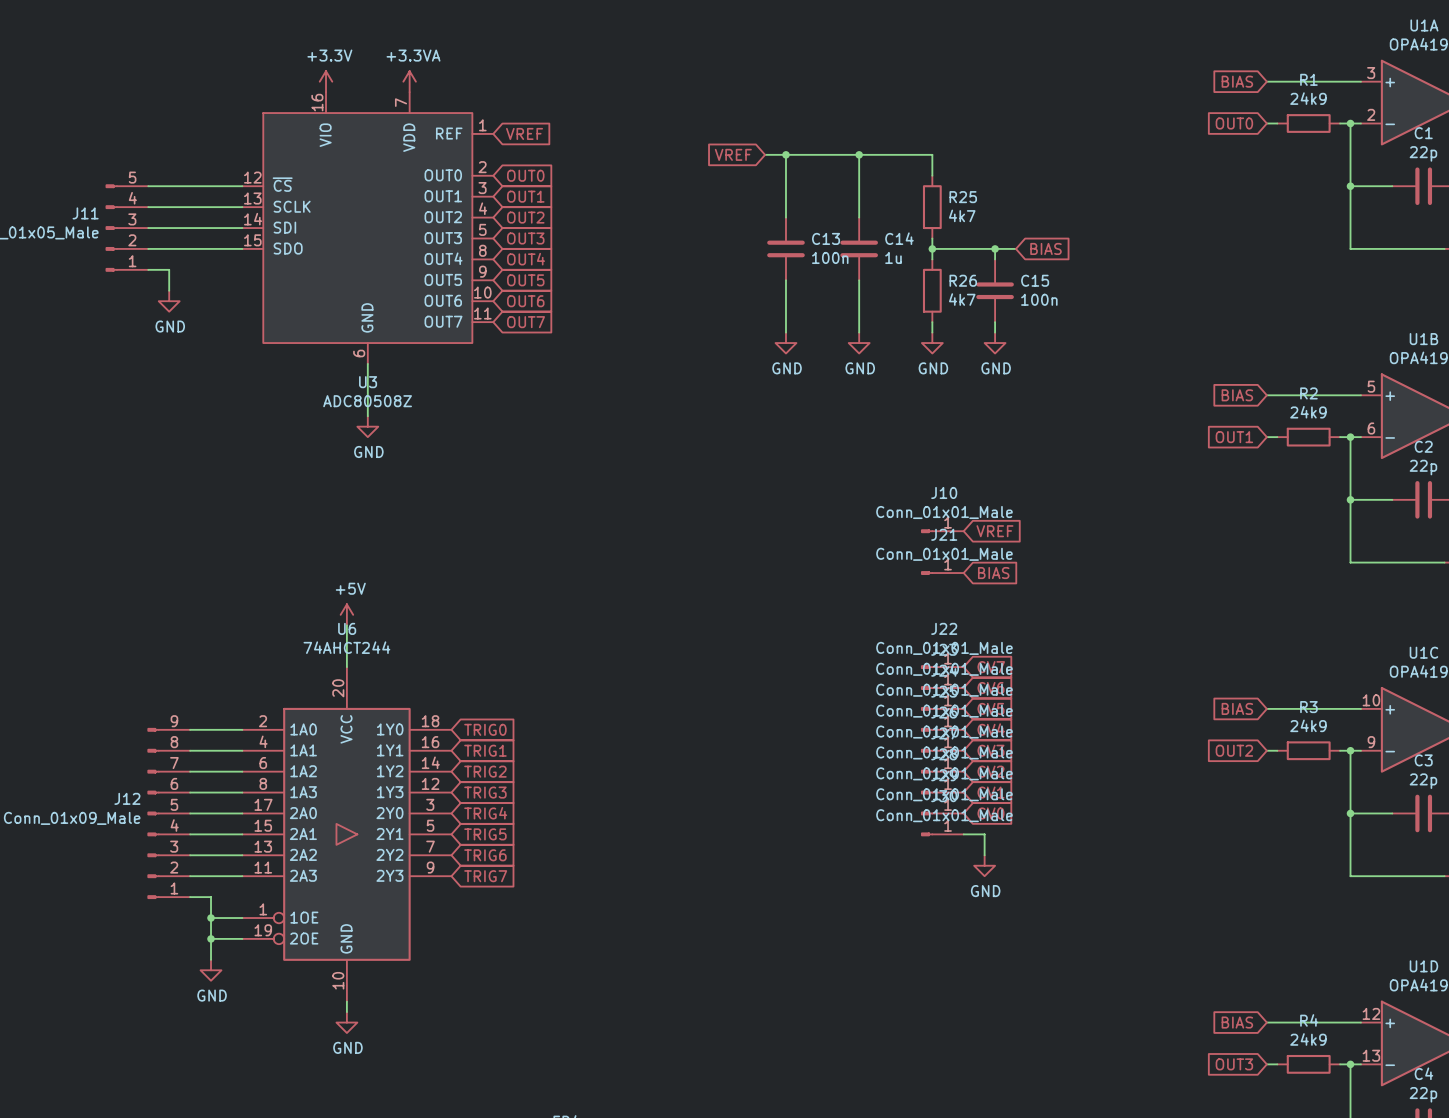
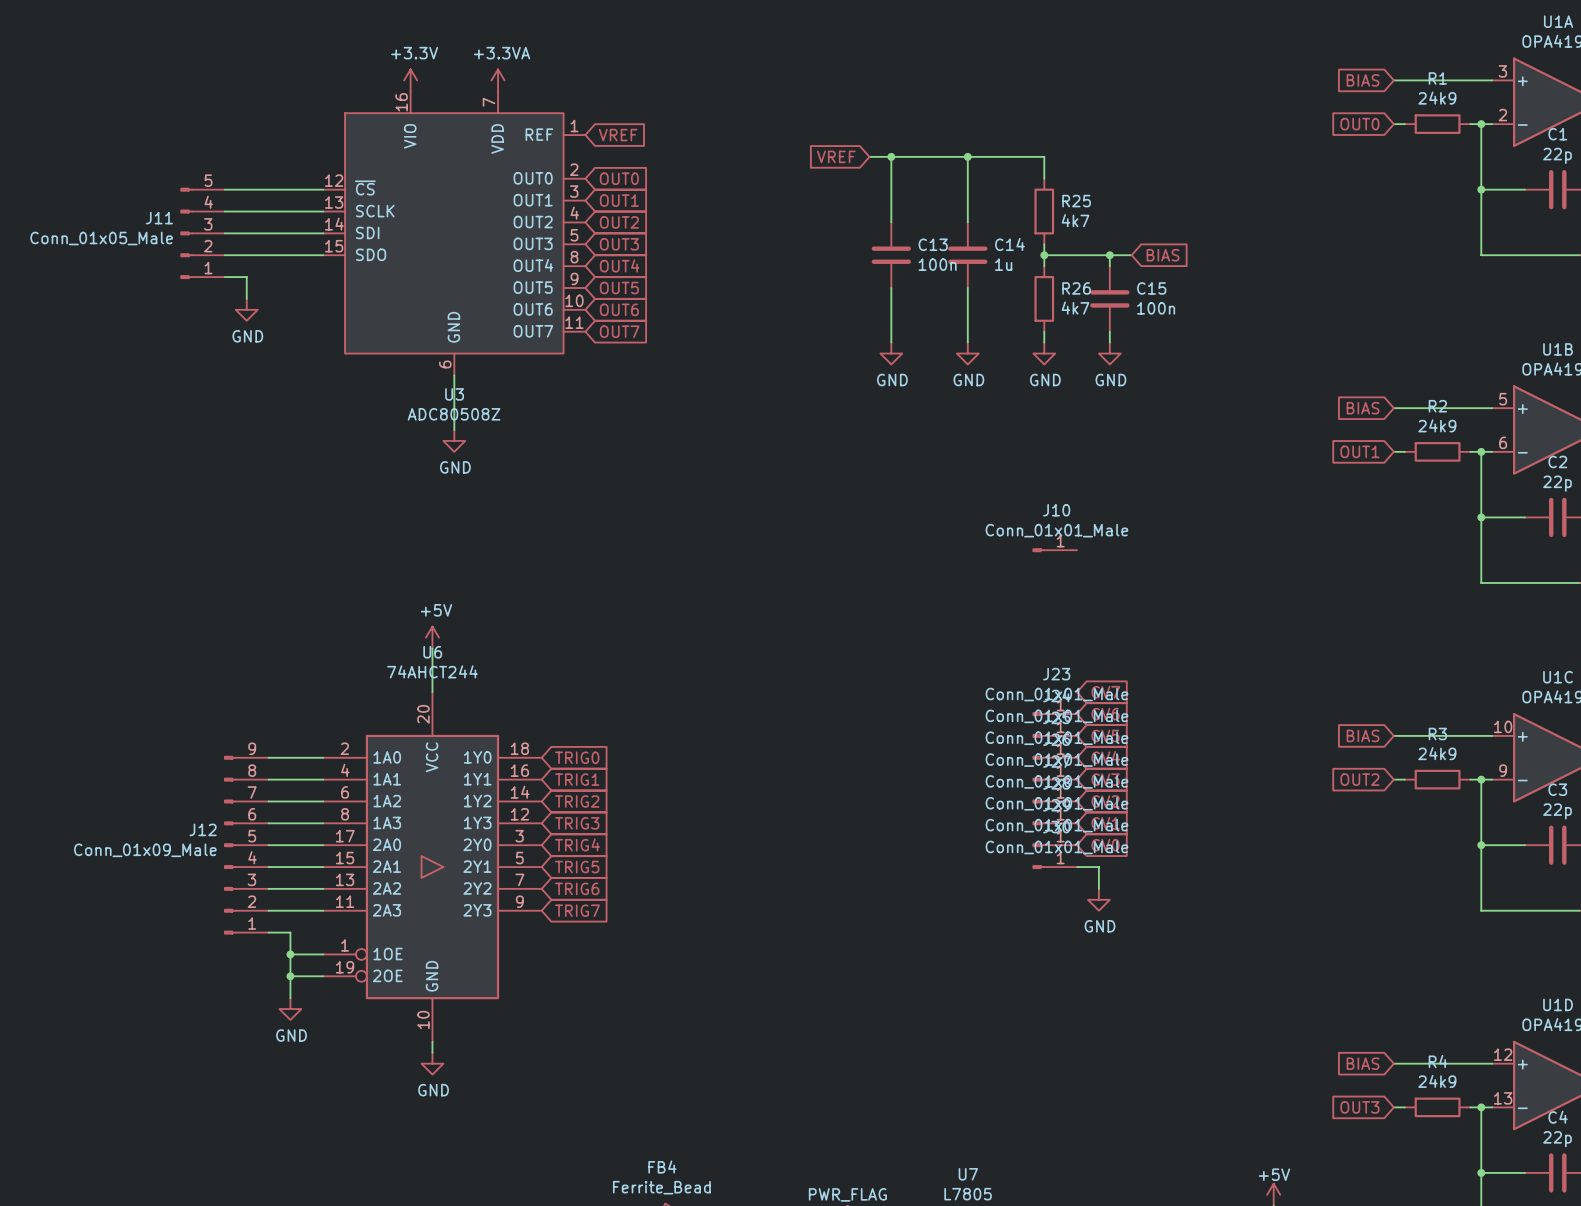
global label: VREF (994, 531) -> none
J21: Conn_01x01_Male (942, 573) -> none
global label: BIAS (993, 573) -> none
J22: Conn_01x01_Male (942, 667) -> none

